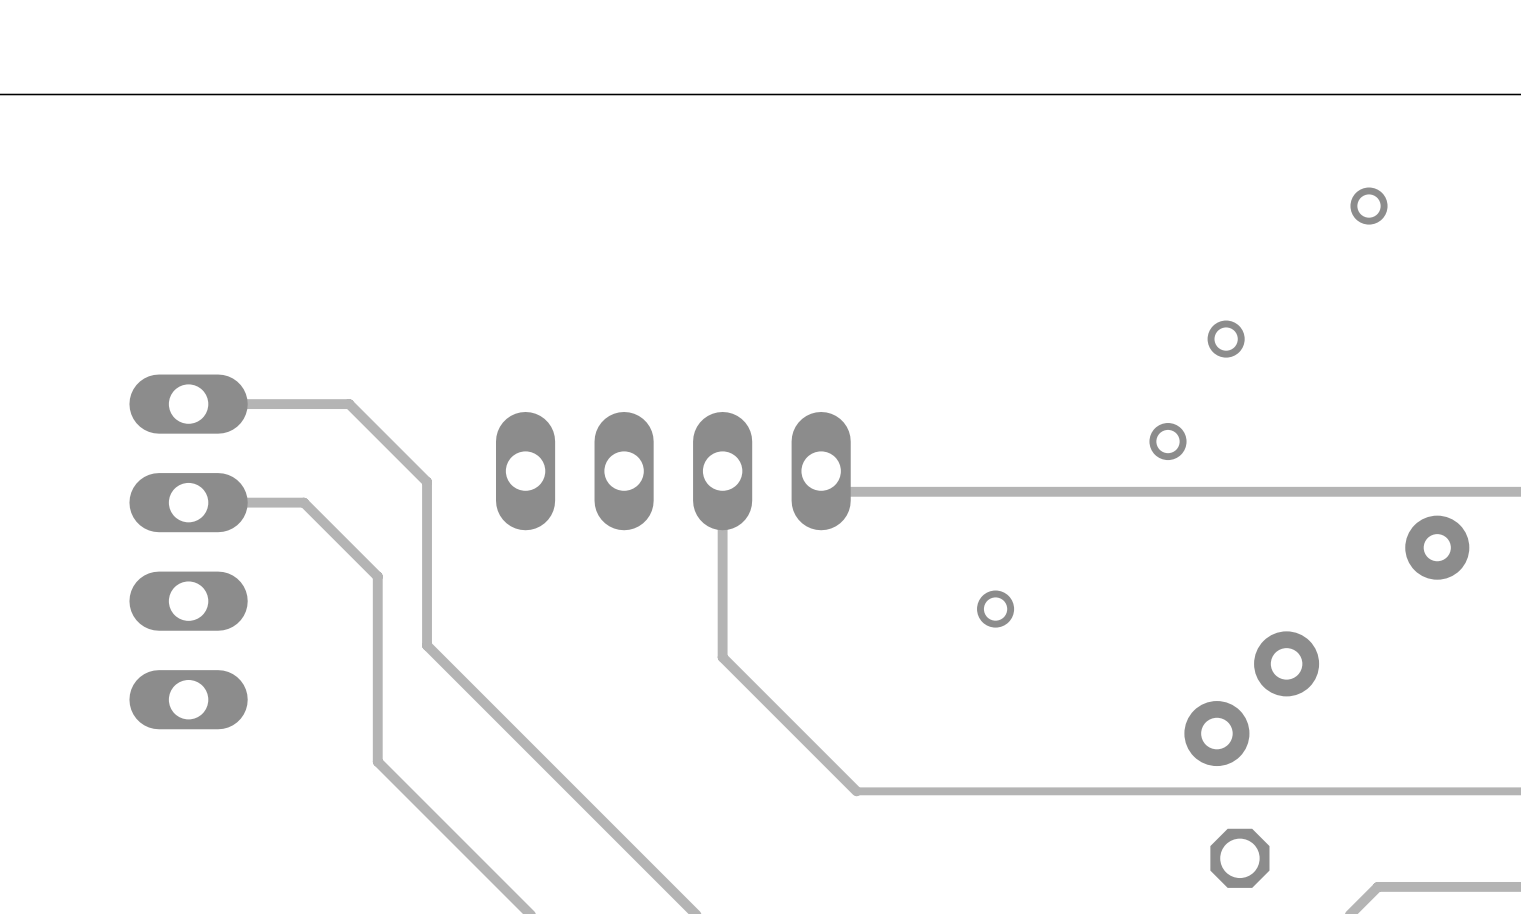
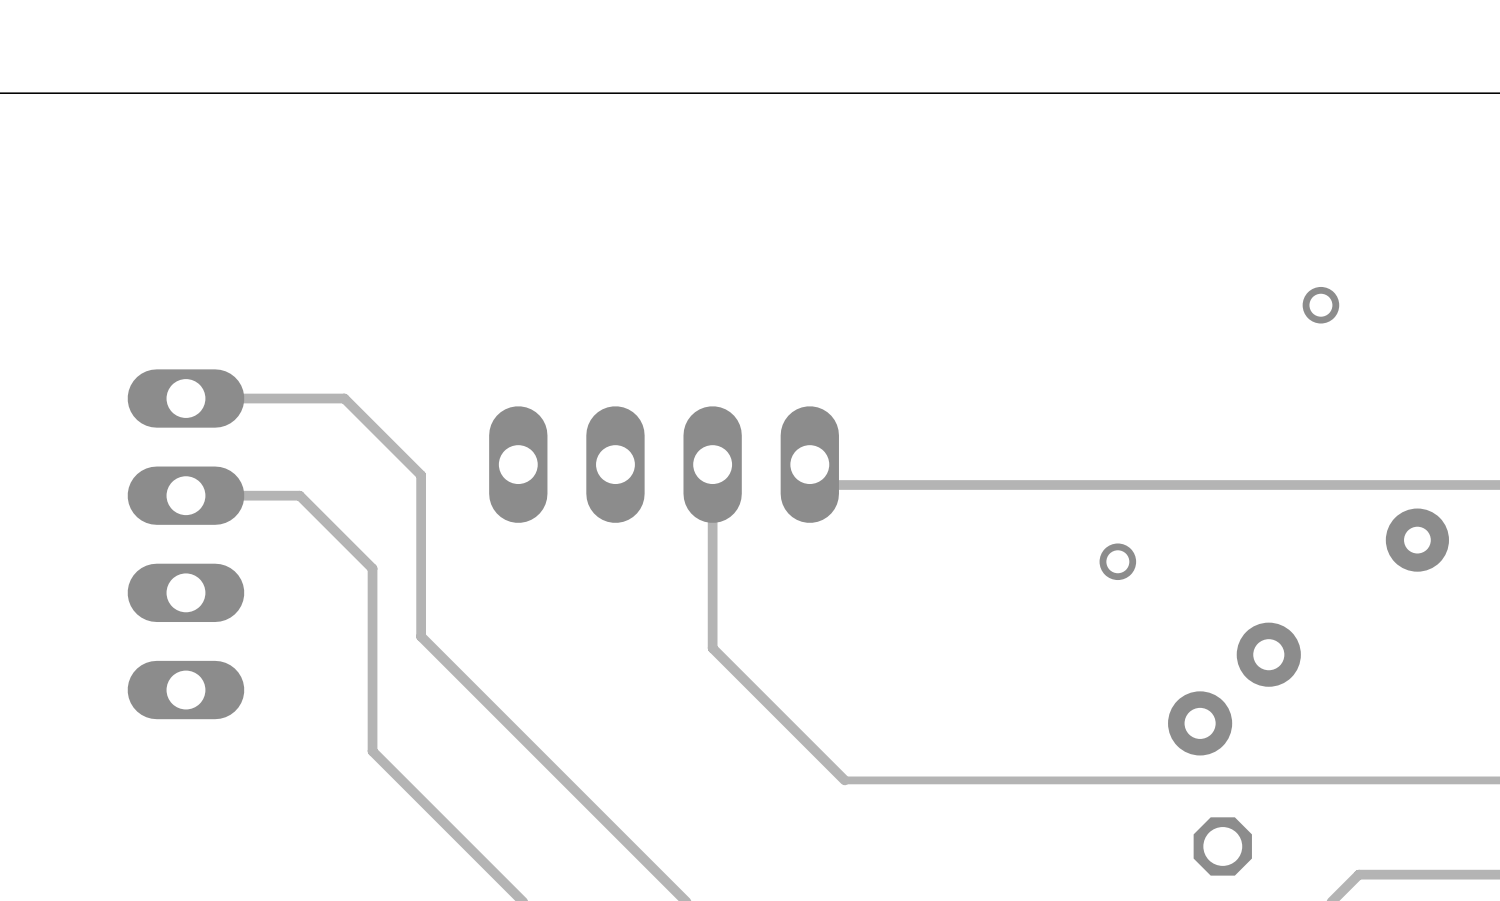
via: (1369, 206) -> none
via: none -> (1320, 305)
via: (1226, 339) -> none
via: (1168, 441) -> none
via: none -> (1117, 561)
via: (995, 609) -> none

